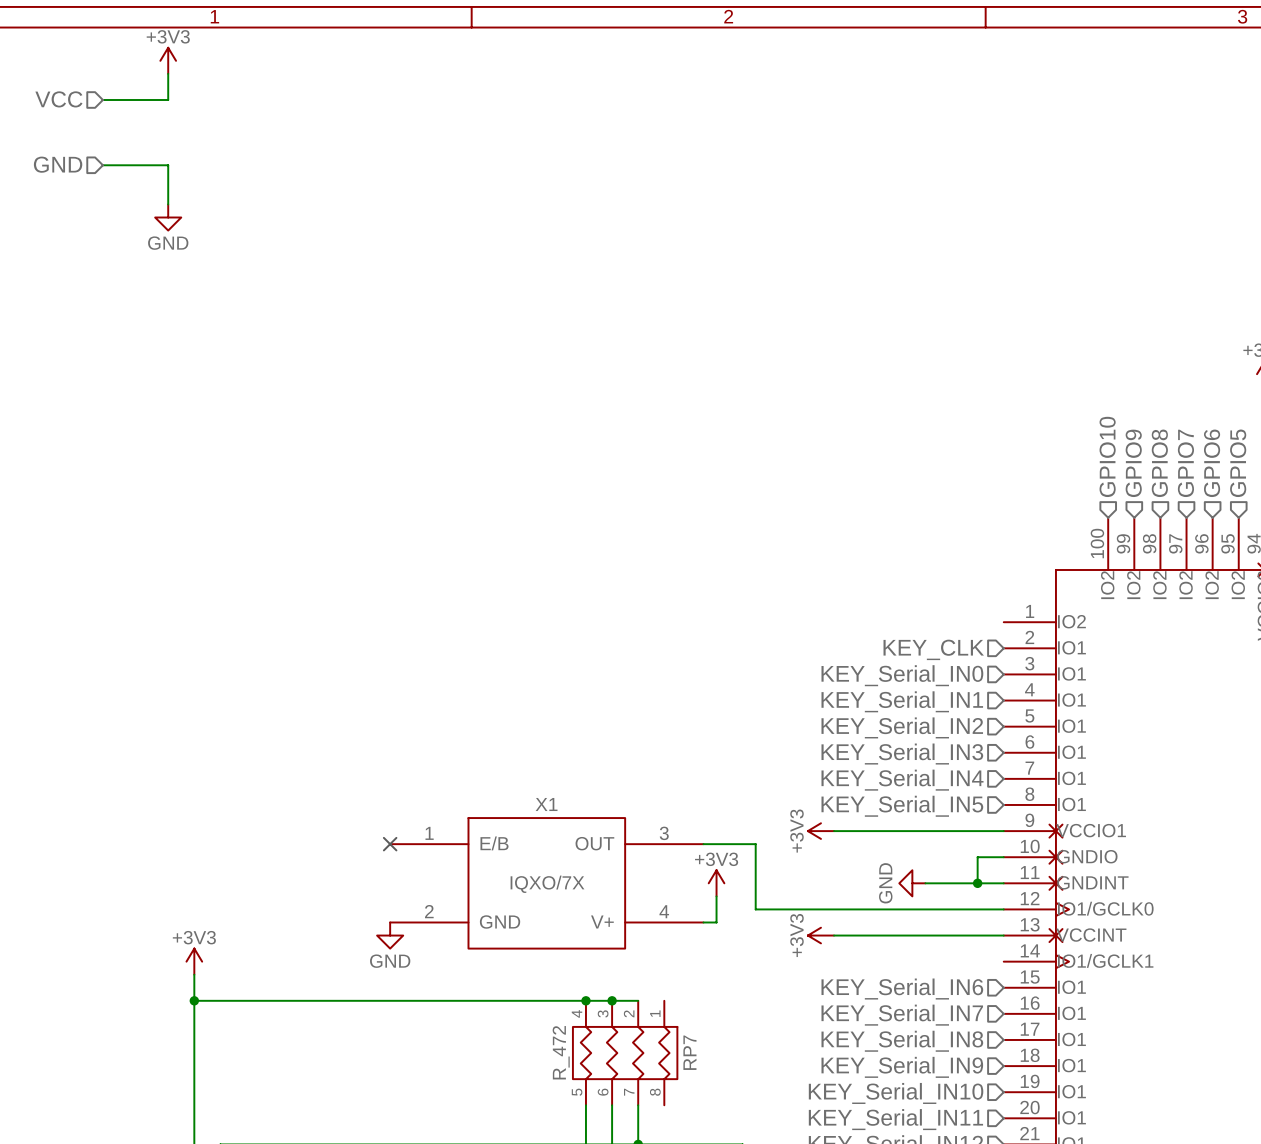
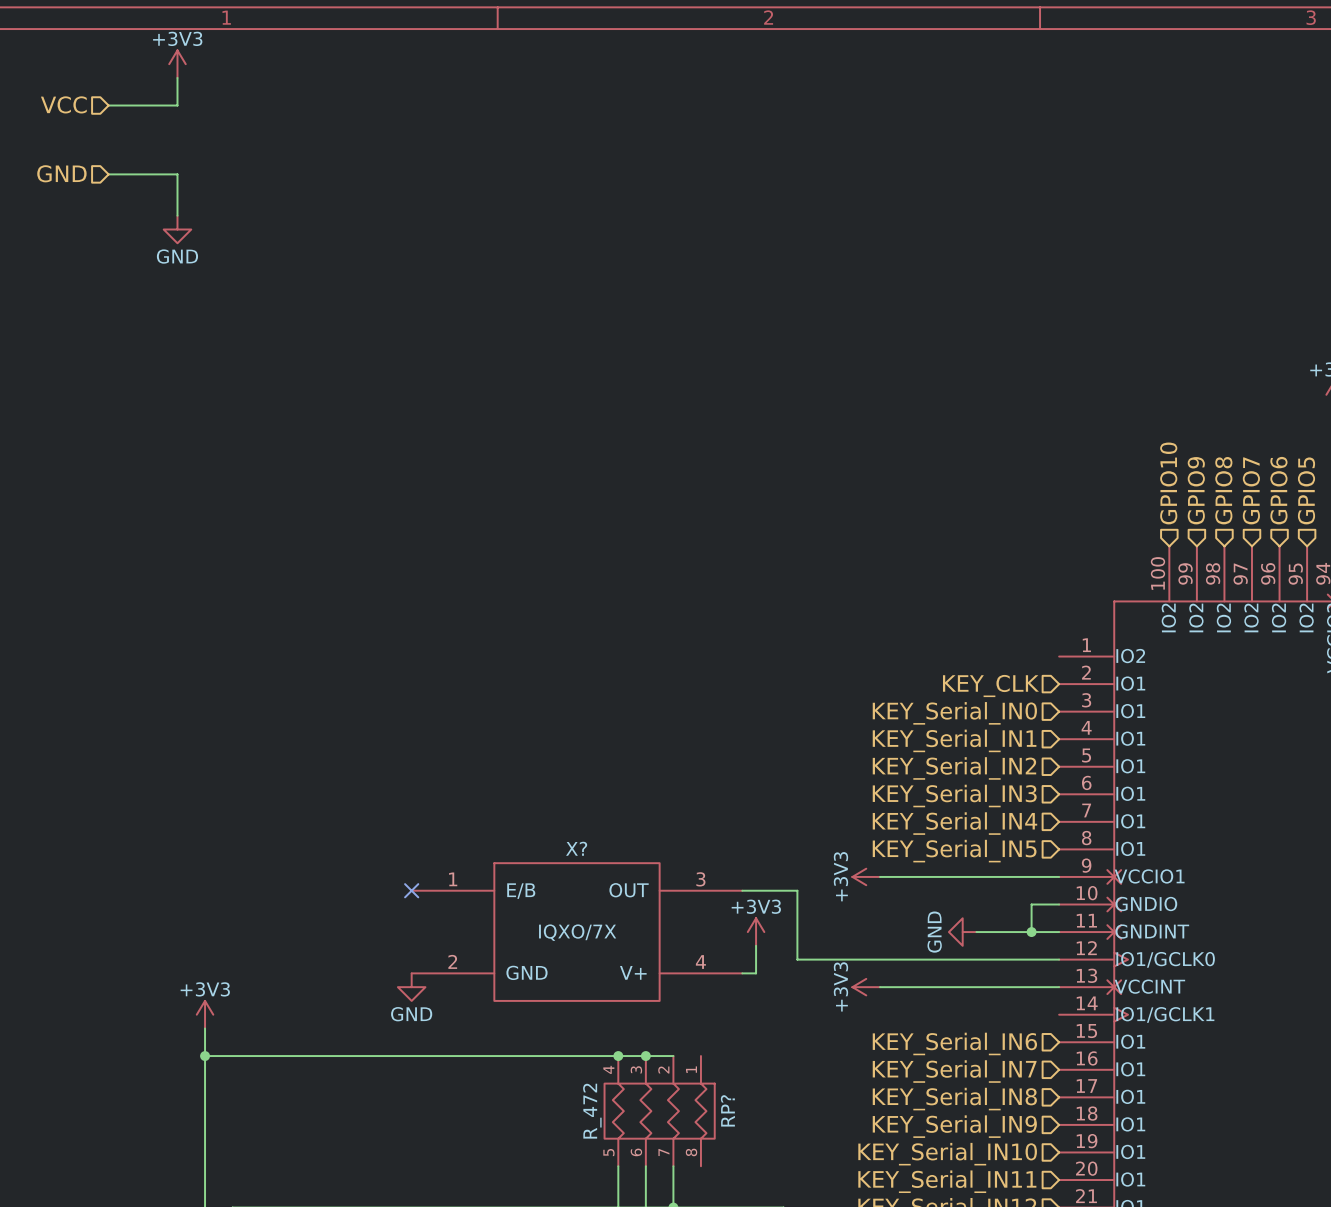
X1 name: X1 (546, 804) -> X? (576, 848)
RP7 name: RP7 (689, 1052) -> RP? (727, 1110)

